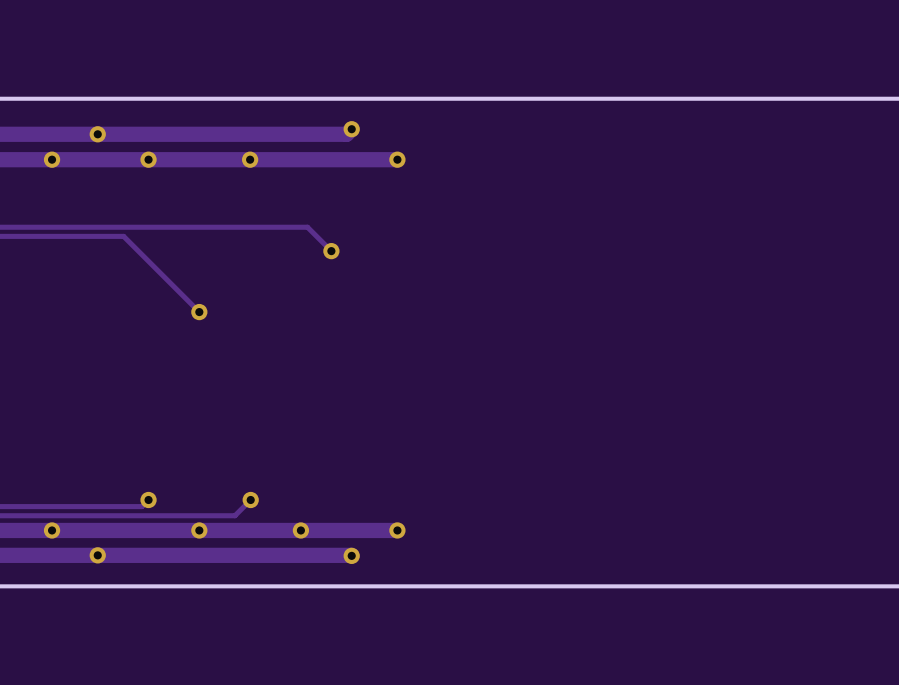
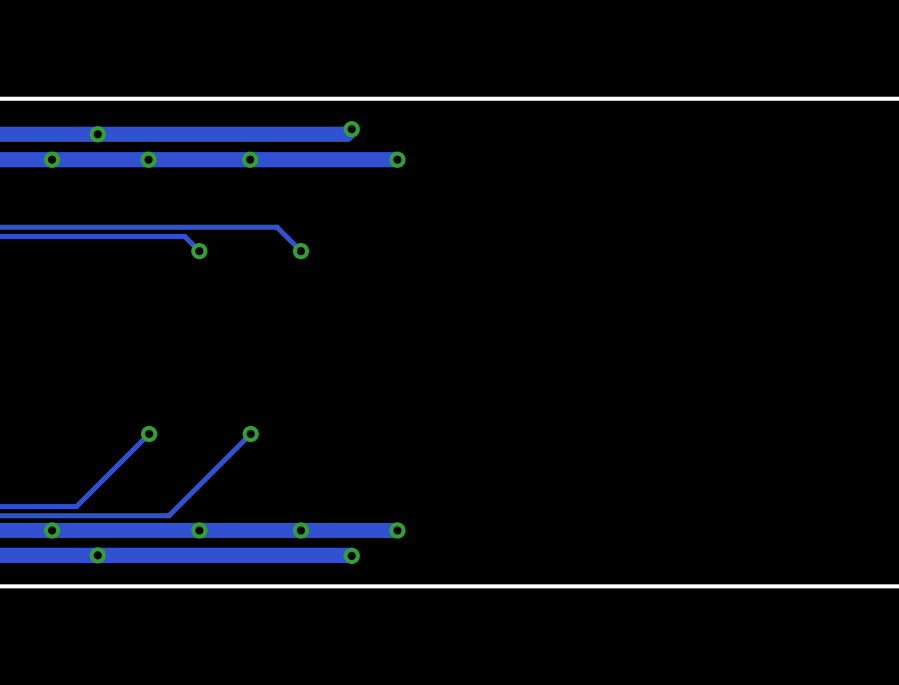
track: (277, 227) (307, 227) (331, 251) -> (277, 227) (300, 251)
track: (123, 236) (199, 312) -> (123, 236) (184, 236) (199, 251)
via: none -> (199, 251)
via position: (331, 251) -> (300, 251)
via: (199, 312) -> none
via: none -> (149, 433)
via: none -> (250, 433)
track: (148, 499) (141, 506) (76, 506) -> (149, 433) (76, 506)
via: (148, 499) -> none
track: (250, 499) (234, 515) (168, 515) -> (250, 433) (168, 515)
via: (250, 499) -> none

